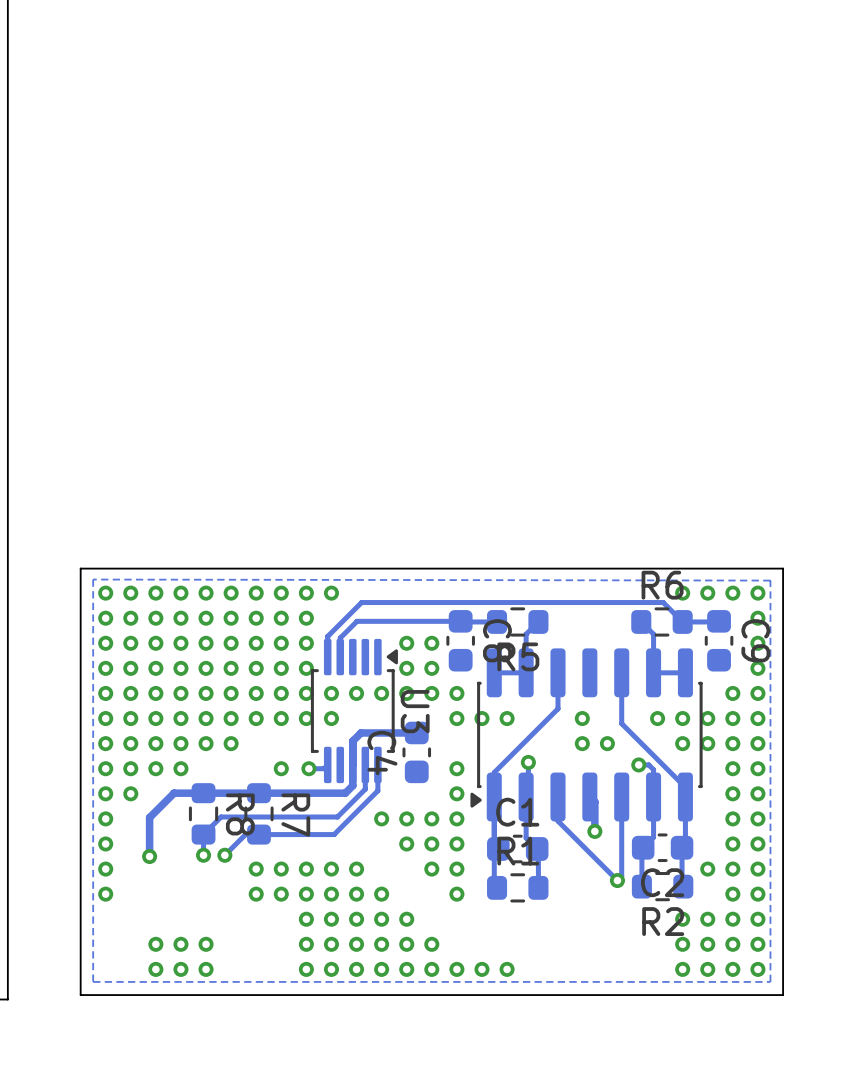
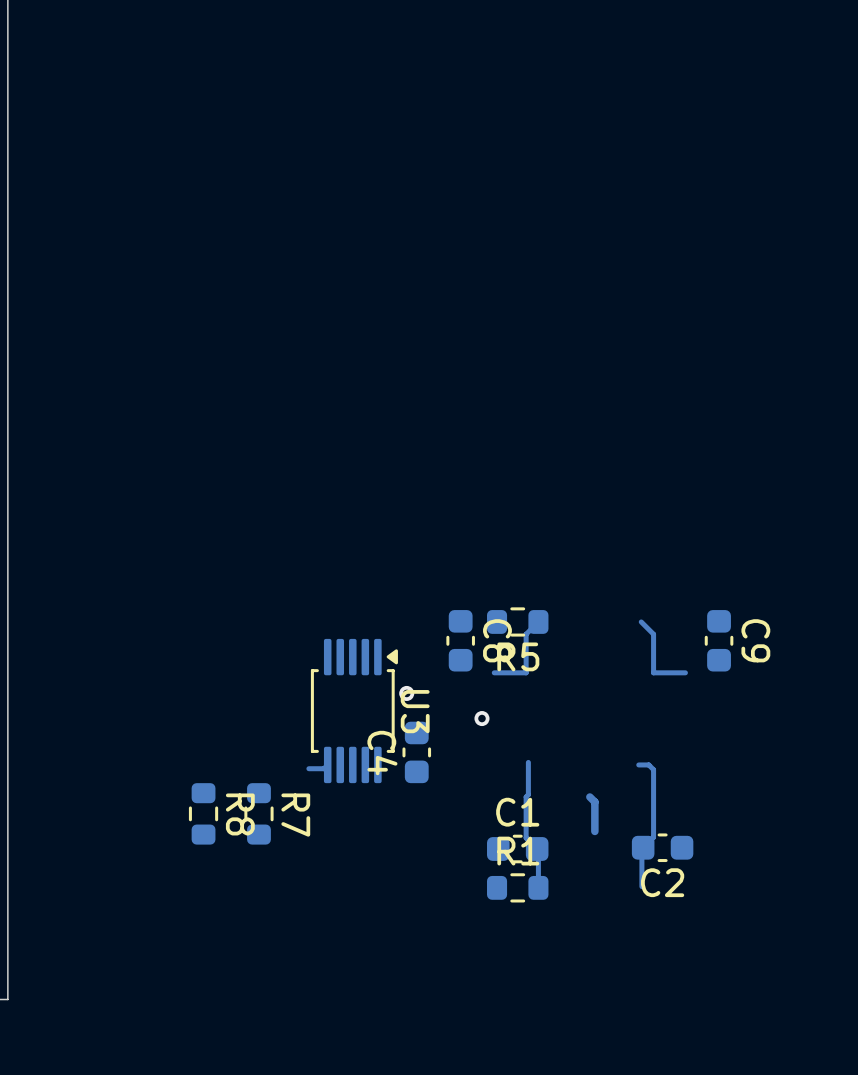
board edge: (783, 568) (80, 568) (80, 995) (783, 995) (783, 568) -> none
zone outline: (93, 579) (770, 580) (770, 981) (93, 981) (93, 579) -> none
via: (105, 593) -> none
via: (130, 593) -> none
via: (155, 593) -> none
via: (180, 593) -> none
via: (206, 593) -> none
via: (231, 593) -> none
via: (256, 593) -> none
via: (281, 593) -> none
via: (306, 593) -> none
via: (331, 593) -> none
via: (682, 593) -> none
via: (707, 593) -> none
via: (732, 593) -> none
via: (757, 593) -> none
via: (105, 618) -> none
via: (130, 618) -> none
via: (155, 618) -> none
via: (180, 618) -> none
via: (206, 618) -> none
via: (231, 618) -> none
via: (256, 618) -> none
via: (281, 618) -> none
via: (306, 618) -> none
via: (757, 618) -> none
track: (497, 621) (357, 621) (340, 638) (340, 657) -> none
R6: (661, 621) -> none
track: (719, 621) (682, 621) (663, 602) (361, 602) (327, 636) (327, 657) -> none
via: (105, 643) -> none
via: (130, 643) -> none
via: (155, 643) -> none
via: (180, 643) -> none
via: (206, 643) -> none
via: (231, 643) -> none
via: (256, 643) -> none
via: (281, 643) -> none
via: (306, 643) -> none
via: (406, 643) -> none
via: (431, 643) -> none
via: (757, 643) -> none
via: (105, 668) -> none
via: (130, 668) -> none
via: (155, 668) -> none
via: (180, 668) -> none
via: (206, 668) -> none
via: (231, 668) -> none
via: (256, 668) -> none
via: (281, 668) -> none
via: (306, 668) -> none
via: (406, 668) -> none
via: (431, 668) -> none
via: (757, 668) -> none
track: (557, 672) (557, 708) (494, 772) (494, 885) (497, 887) -> none
track: (621, 672) (621, 723) (685, 787) (685, 844) (682, 847) (683, 886) -> none
via: (105, 693) -> none
via: (130, 693) -> none
via: (155, 693) -> none
via: (180, 693) -> none
via: (206, 693) -> none
via: (231, 693) -> none
via: (256, 693) -> none
via: (281, 693) -> none
via: (306, 693) -> none
via: (331, 693) -> none
via: (356, 693) -> none
via: (381, 693) -> none
via: (431, 693) -> none
via: (456, 693) -> none
via: (732, 693) -> none
via: (757, 693) -> none
via: (105, 718) -> none
via: (130, 718) -> none
via: (155, 718) -> none
via: (180, 718) -> none
via: (206, 718) -> none
via: (231, 718) -> none
via: (256, 718) -> none
via: (281, 718) -> none
via: (306, 718) -> none
via: (331, 718) -> none
via: (456, 718) -> none
via: (507, 718) -> none
via: (582, 718) -> none
via: (657, 718) -> none
via: (682, 718) -> none
via: (707, 718) -> none
via: (732, 718) -> none
via: (757, 718) -> none
track: (416, 732) (360, 732) (352, 741) (352, 785) (345, 793) (174, 793) (149, 817) (149, 856) -> none
part: (586, 734) -> none
via: (105, 743) -> none
via: (130, 743) -> none
via: (155, 743) -> none
via: (180, 743) -> none
via: (206, 743) -> none
via: (231, 743) -> none
via: (582, 743) -> none
via: (607, 743) -> none
via: (682, 743) -> none
via: (707, 743) -> none
via: (732, 743) -> none
via: (757, 743) -> none
via: (528, 762) -> none
track: (365, 764) (365, 789) (337, 817) (221, 817) (203, 834) (203, 855) -> none
track: (377, 764) (377, 790) (334, 834) (245, 834) (224, 855) -> none
via: (638, 764) -> none
via: (105, 768) -> none
via: (130, 768) -> none
via: (155, 768) -> none
via: (180, 768) -> none
via: (281, 768) -> none
via: (308, 768) -> none
via: (456, 768) -> none
via: (732, 768) -> none
via: (757, 768) -> none
via: (105, 793) -> none
via: (130, 793) -> none
via: (456, 793) -> none
via: (732, 793) -> none
via: (757, 793) -> none
track: (621, 797) (621, 876) (617, 880) (557, 821) (557, 797) -> none
via: (105, 818) -> none
via: (381, 818) -> none
via: (406, 818) -> none
via: (431, 818) -> none
via: (456, 818) -> none
via: (732, 818) -> none
via: (757, 818) -> none
via: (594, 831) -> none
via: (105, 843) -> none
via: (406, 843) -> none
via: (431, 843) -> none
via: (456, 843) -> none
via: (732, 843) -> none
via: (757, 843) -> none
via: (203, 855) -> none
via: (224, 855) -> none
via: (149, 856) -> none
via: (105, 869) -> none
via: (256, 869) -> none
via: (281, 869) -> none
via: (306, 869) -> none
via: (331, 869) -> none
via: (356, 869) -> none
via: (431, 869) -> none
via: (456, 869) -> none
via: (707, 869) -> none
via: (732, 869) -> none
via: (757, 869) -> none
via: (617, 880) -> none
R2: (662, 886) -> none
via: (105, 894) -> none
via: (256, 894) -> none
via: (281, 894) -> none
via: (306, 894) -> none
via: (331, 894) -> none
via: (356, 894) -> none
via: (381, 894) -> none
via: (456, 894) -> none
via: (732, 894) -> none
via: (757, 894) -> none
via: (306, 919) -> none
via: (331, 919) -> none
via: (356, 919) -> none
via: (381, 919) -> none
via: (406, 919) -> none
via: (682, 919) -> none
via: (707, 919) -> none
via: (732, 919) -> none
via: (757, 919) -> none
via: (155, 944) -> none
via: (180, 944) -> none
via: (206, 944) -> none
via: (306, 944) -> none
via: (331, 944) -> none
via: (356, 944) -> none
via: (381, 944) -> none
via: (406, 944) -> none
via: (431, 944) -> none
via: (682, 944) -> none
via: (707, 944) -> none
via: (732, 944) -> none
via: (757, 944) -> none
via: (155, 969) -> none
via: (180, 969) -> none
via: (206, 969) -> none
via: (306, 969) -> none
via: (331, 969) -> none
via: (356, 969) -> none
via: (381, 969) -> none
via: (406, 969) -> none
via: (431, 969) -> none
via: (456, 969) -> none
via: (481, 969) -> none
via: (507, 969) -> none
via: (682, 969) -> none
via: (707, 969) -> none
via: (732, 969) -> none
via: (757, 969) -> none

